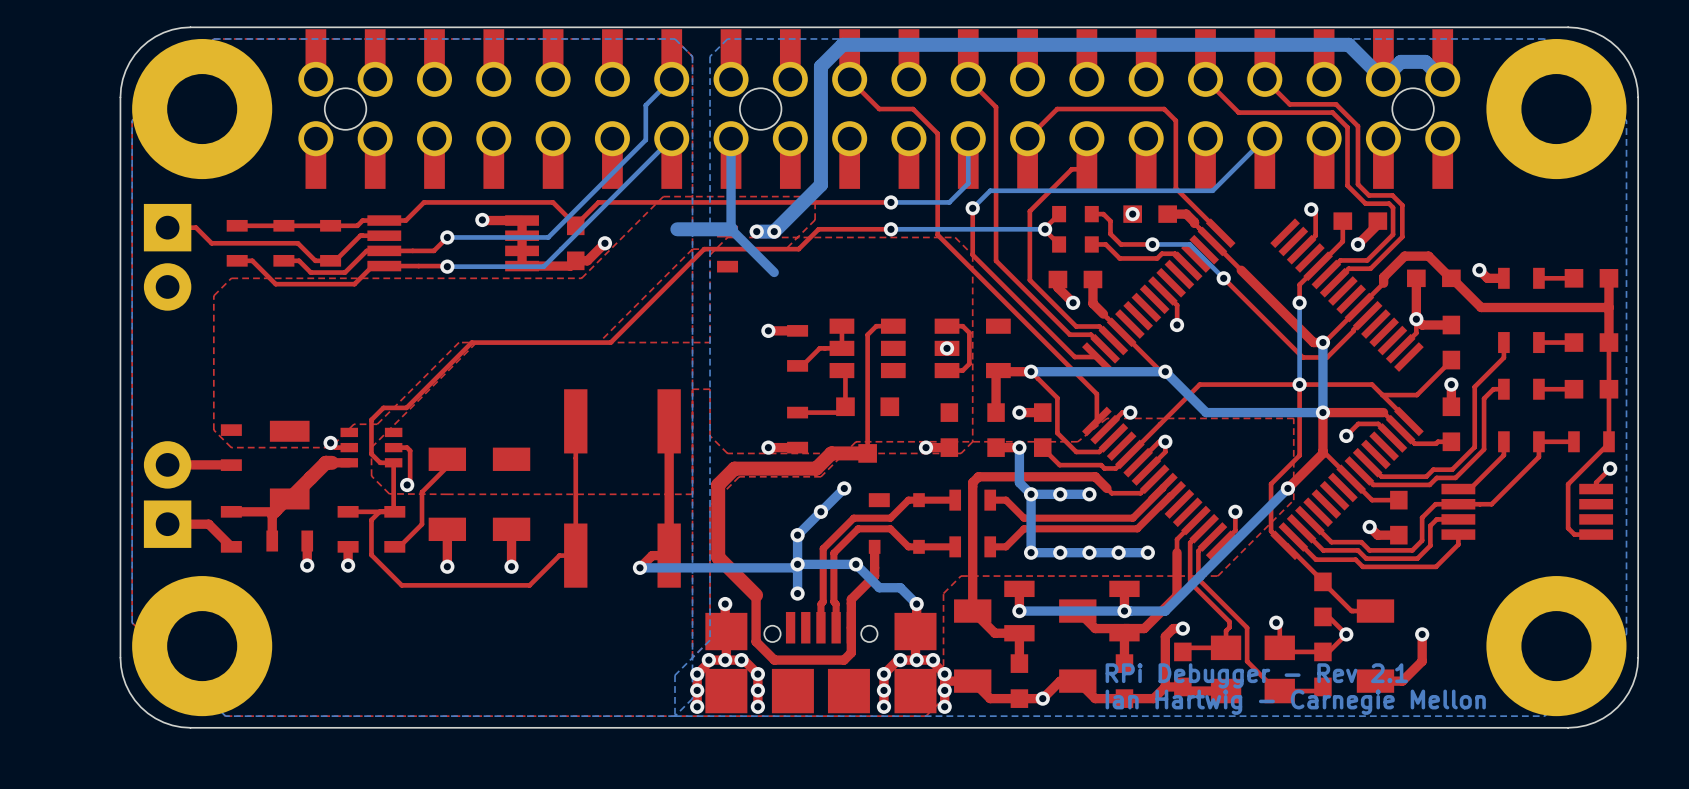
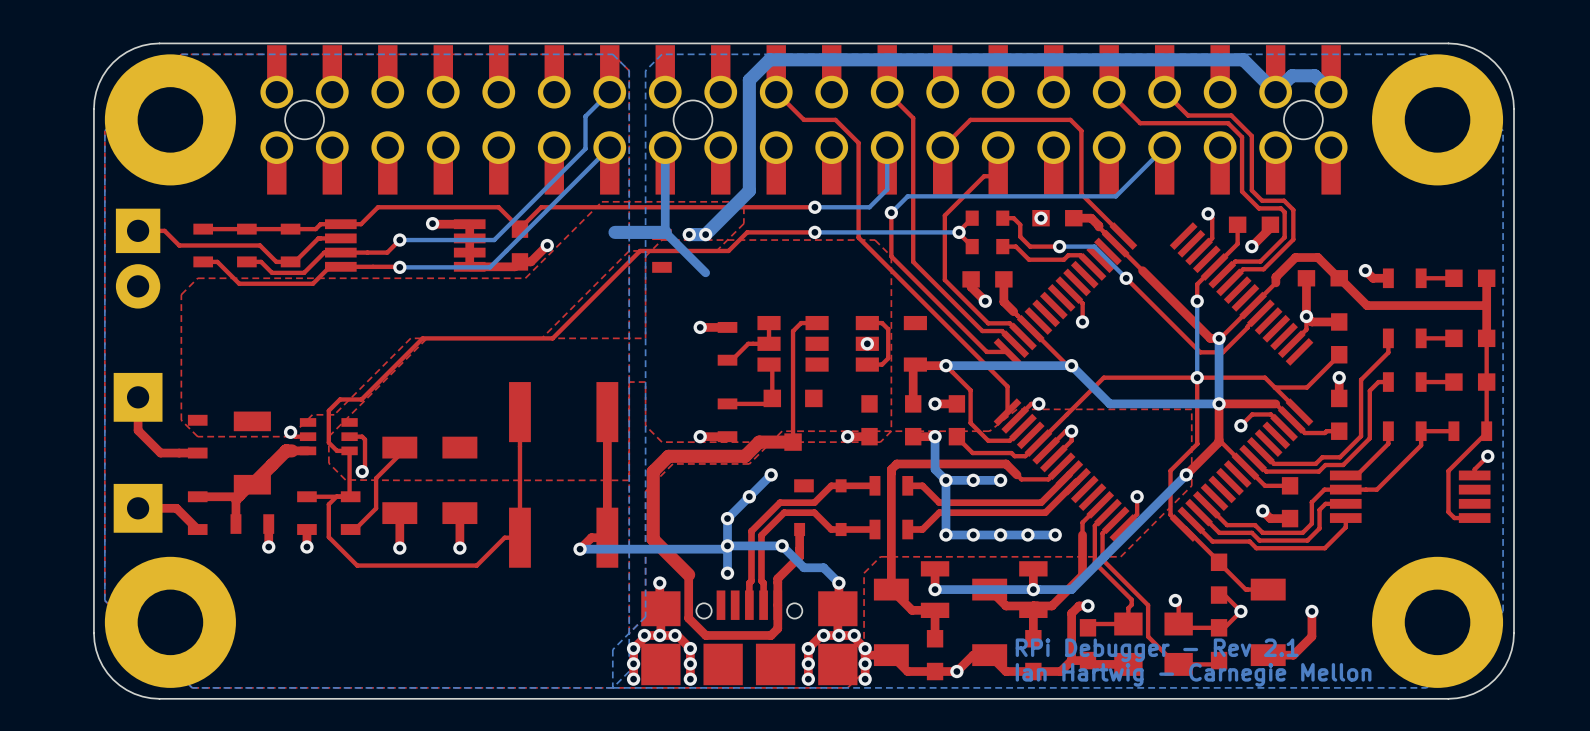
part: none -> (138, 397)
top track: (231, 464) (167, 464) -> (197, 453) (160, 453) (138, 430) (138, 397)
part: (167, 494) -> none
part: none -> (138, 508)

